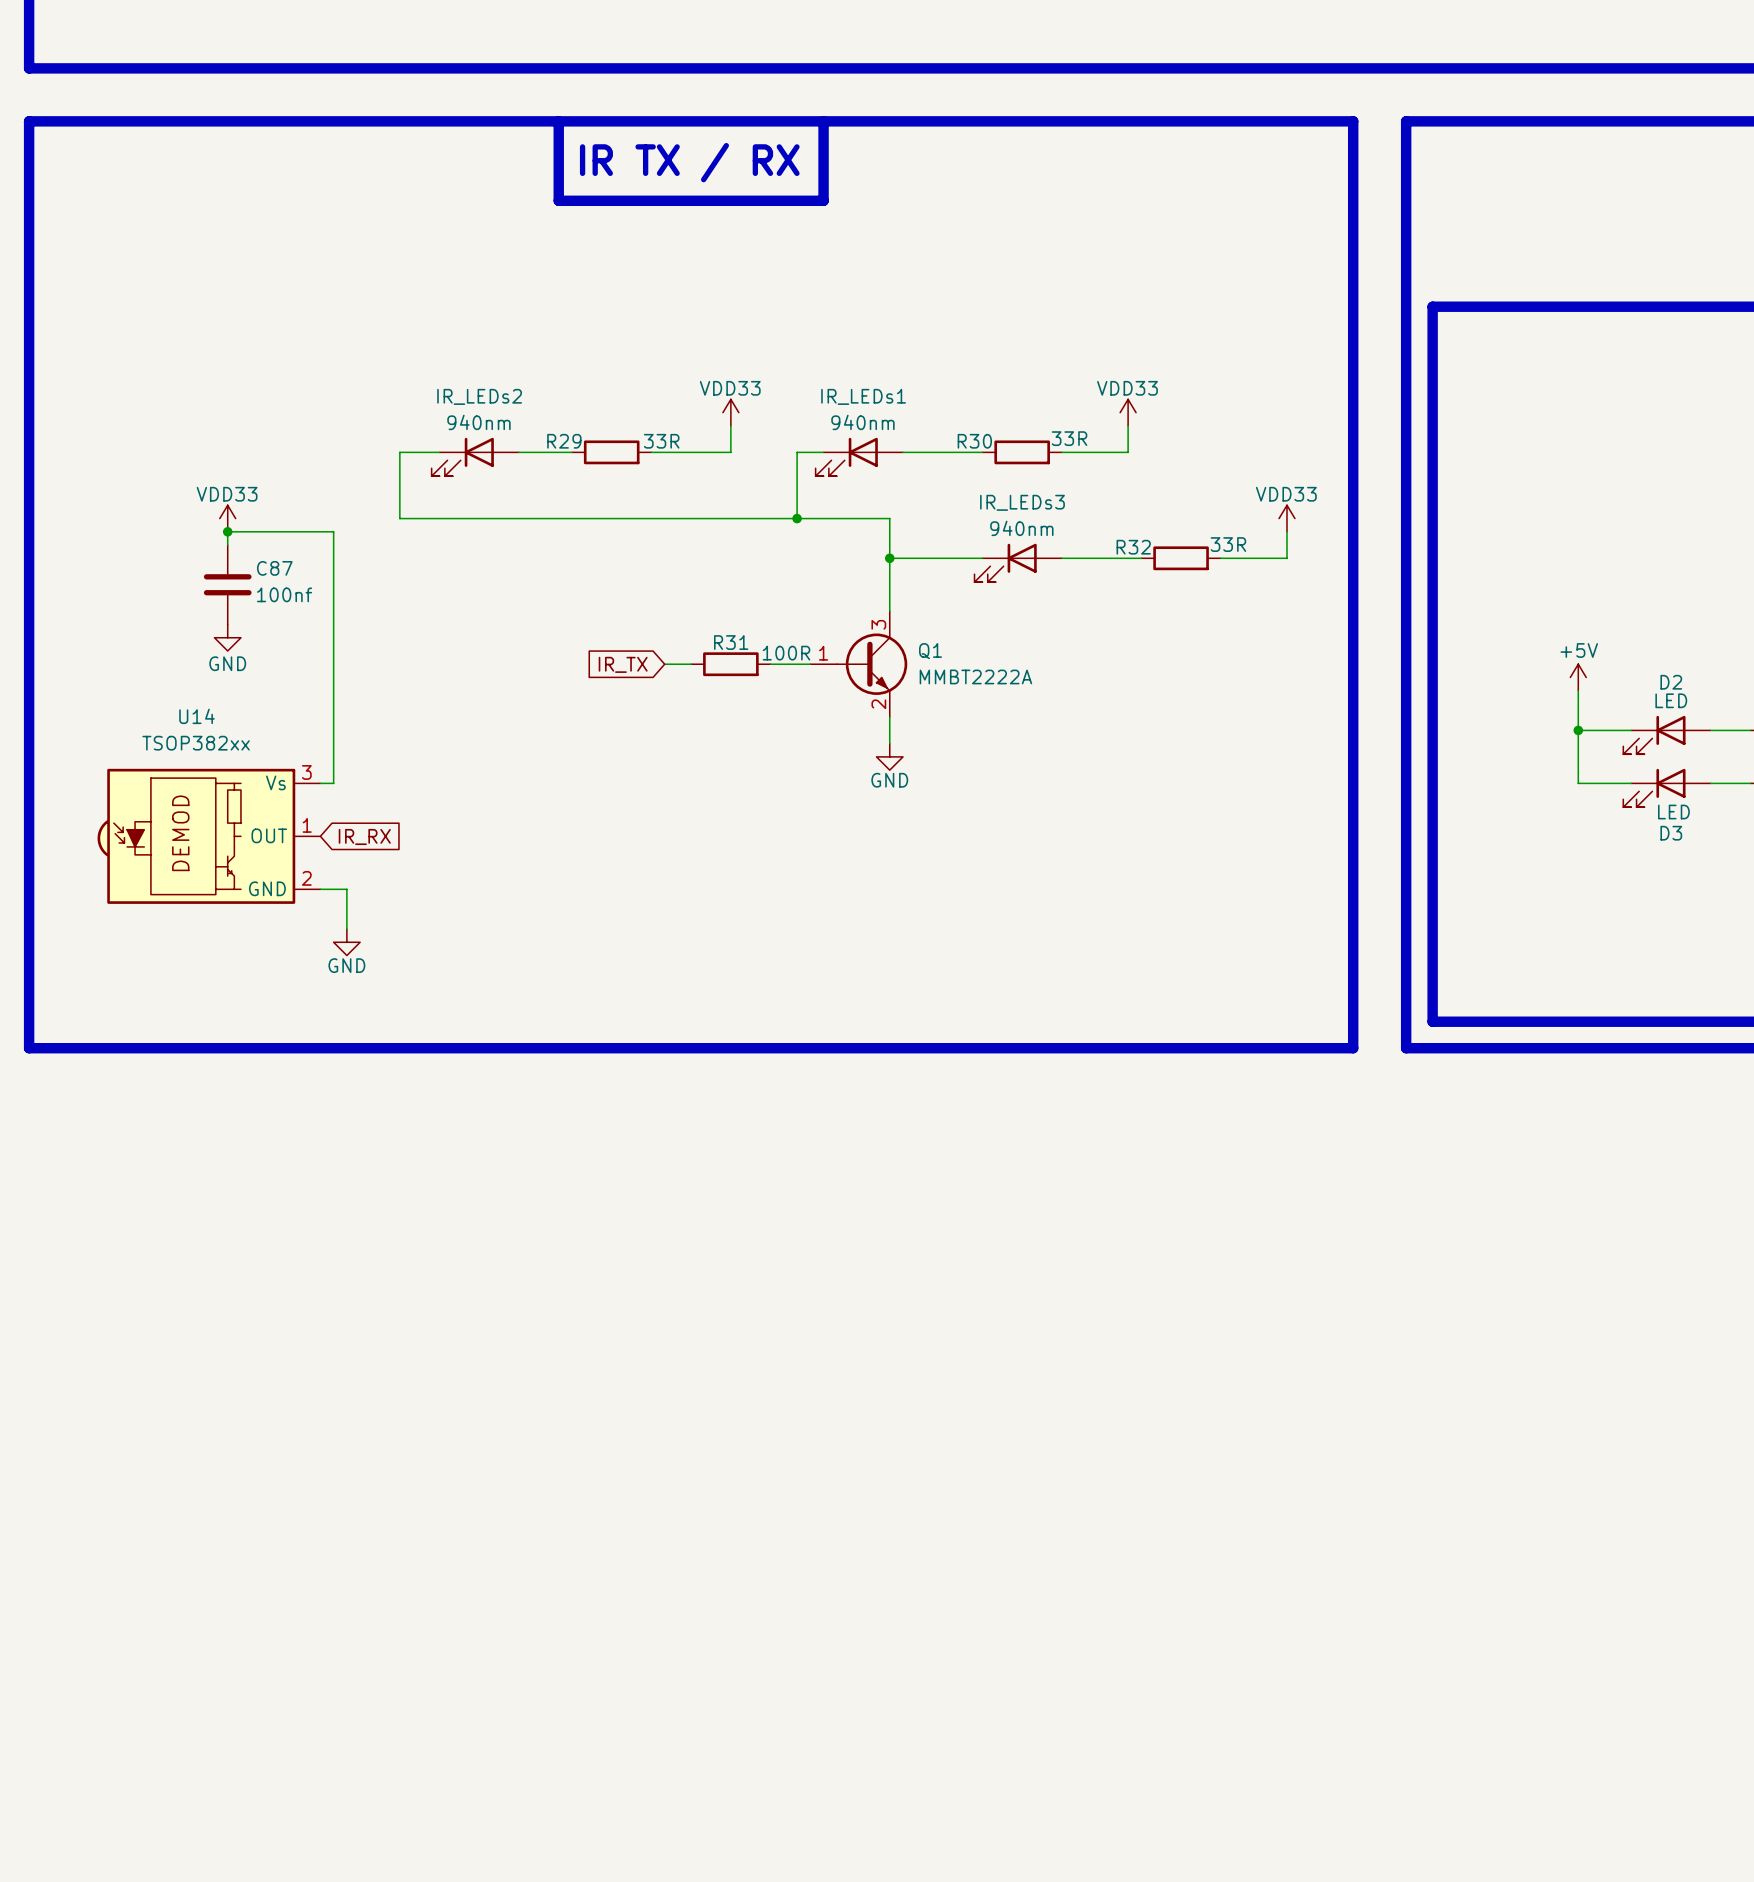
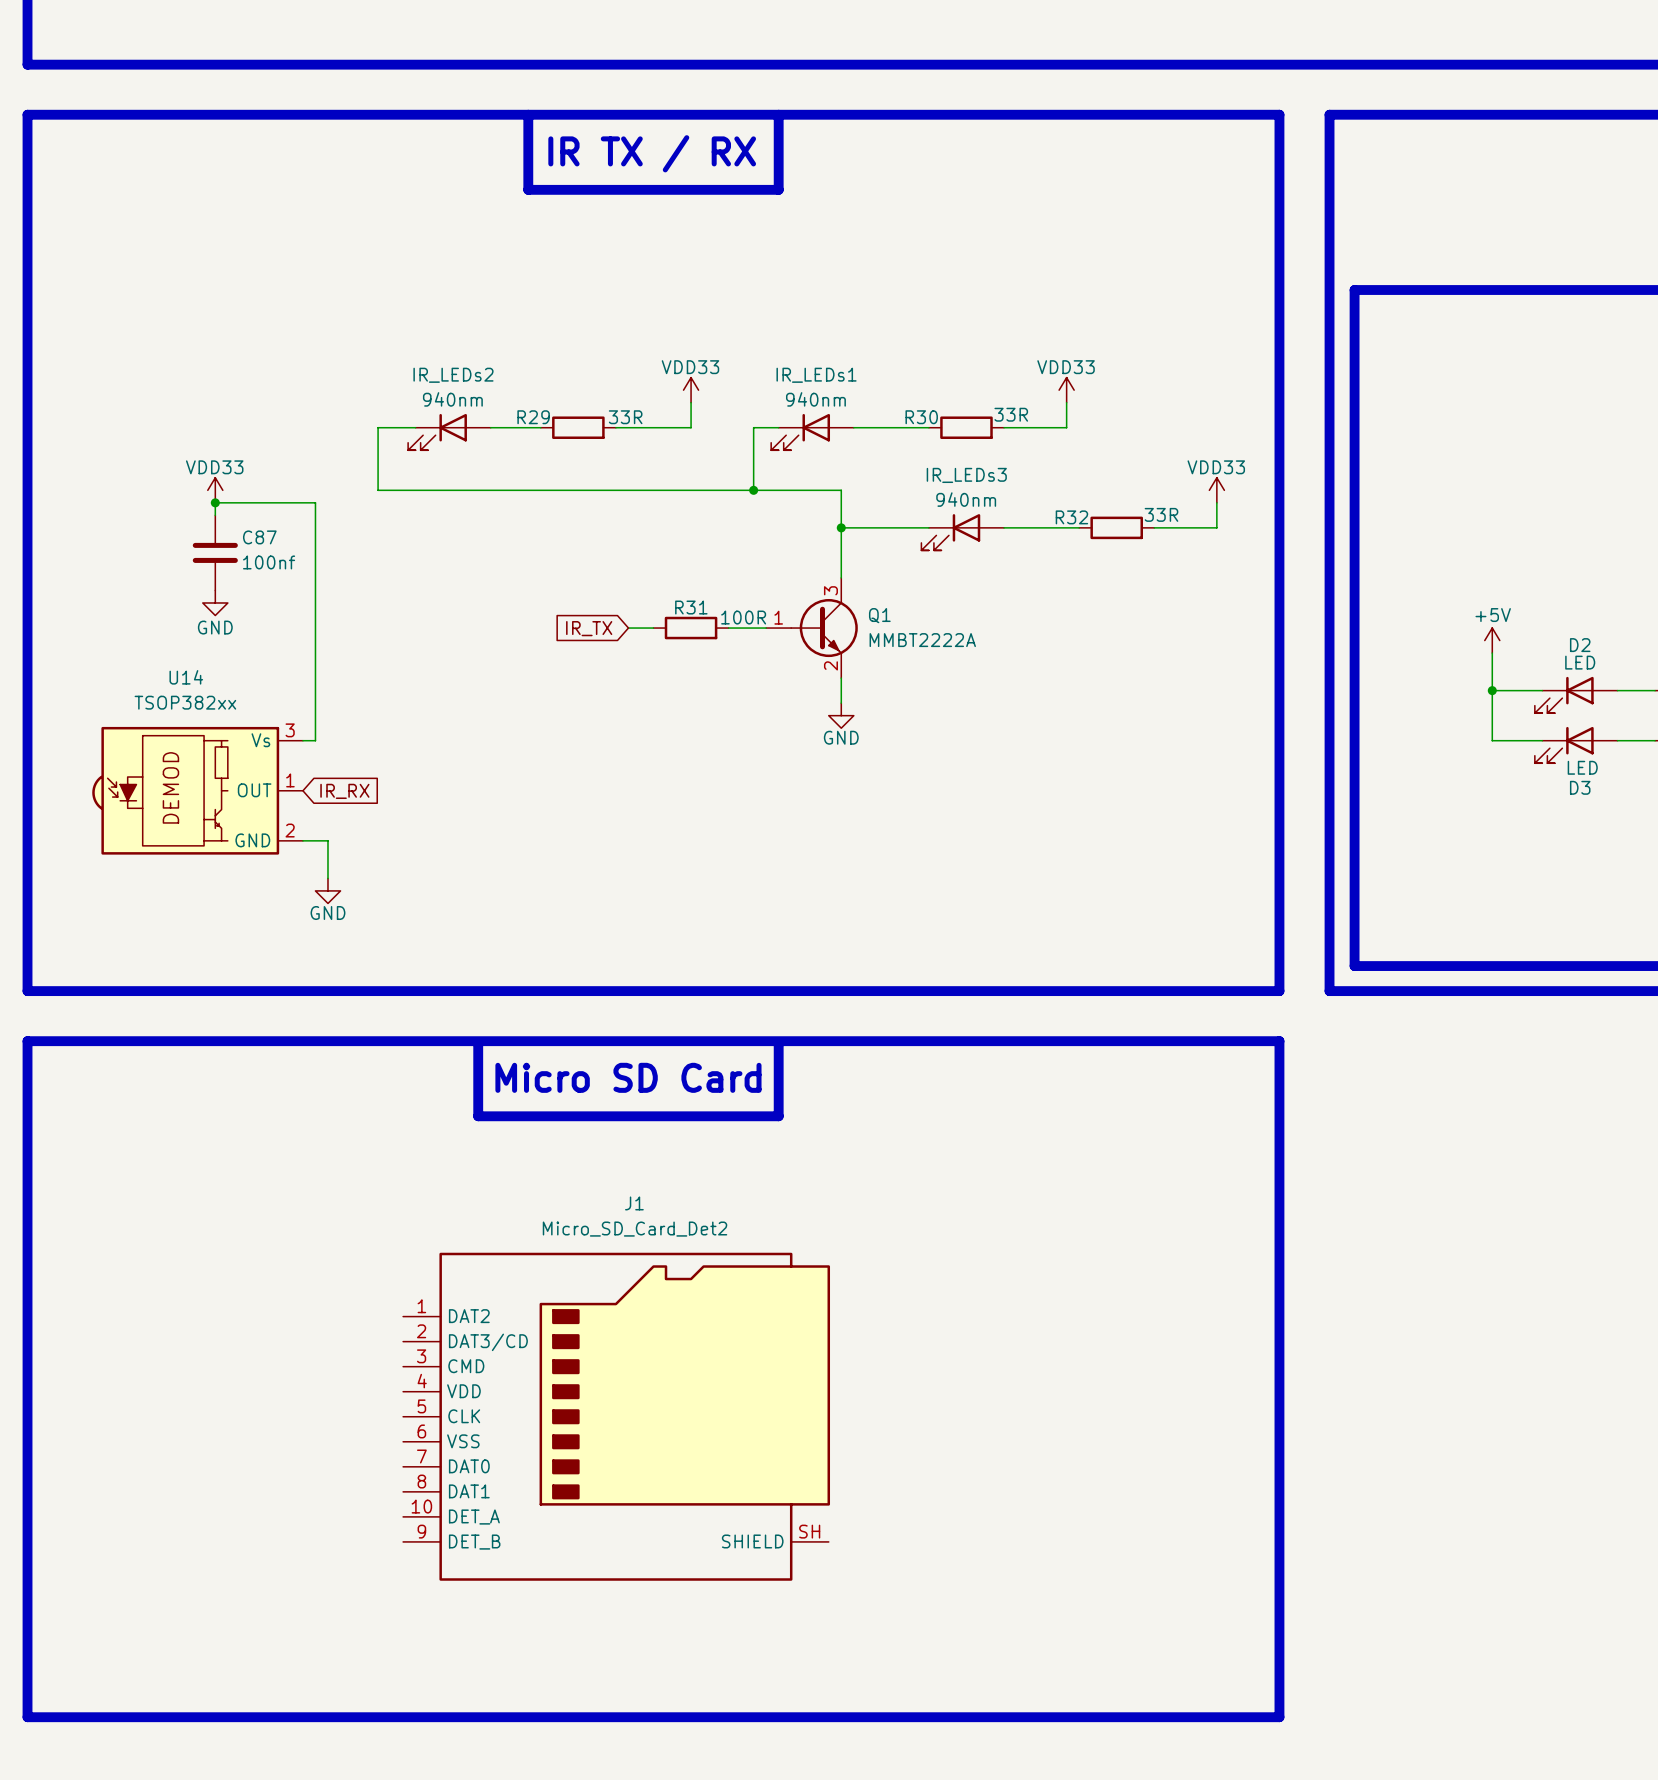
line: none -> (27, 1041) (27, 1717) (1279, 1717) (1279, 1041) (27, 1041)
line: none -> (478, 1046) (478, 1116) (778, 1116) (778, 1046)
text: none -> Micro SD Card (628, 1077)
J1: none -> Micro_SD_Card_Det2 (616, 1416)

